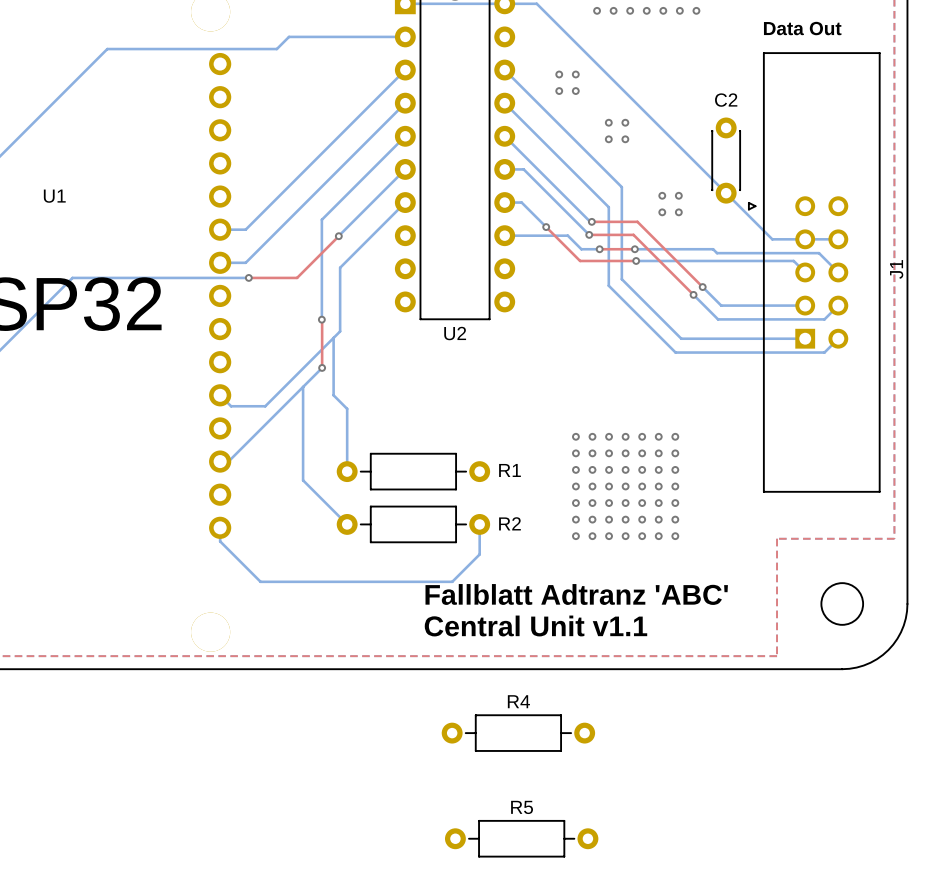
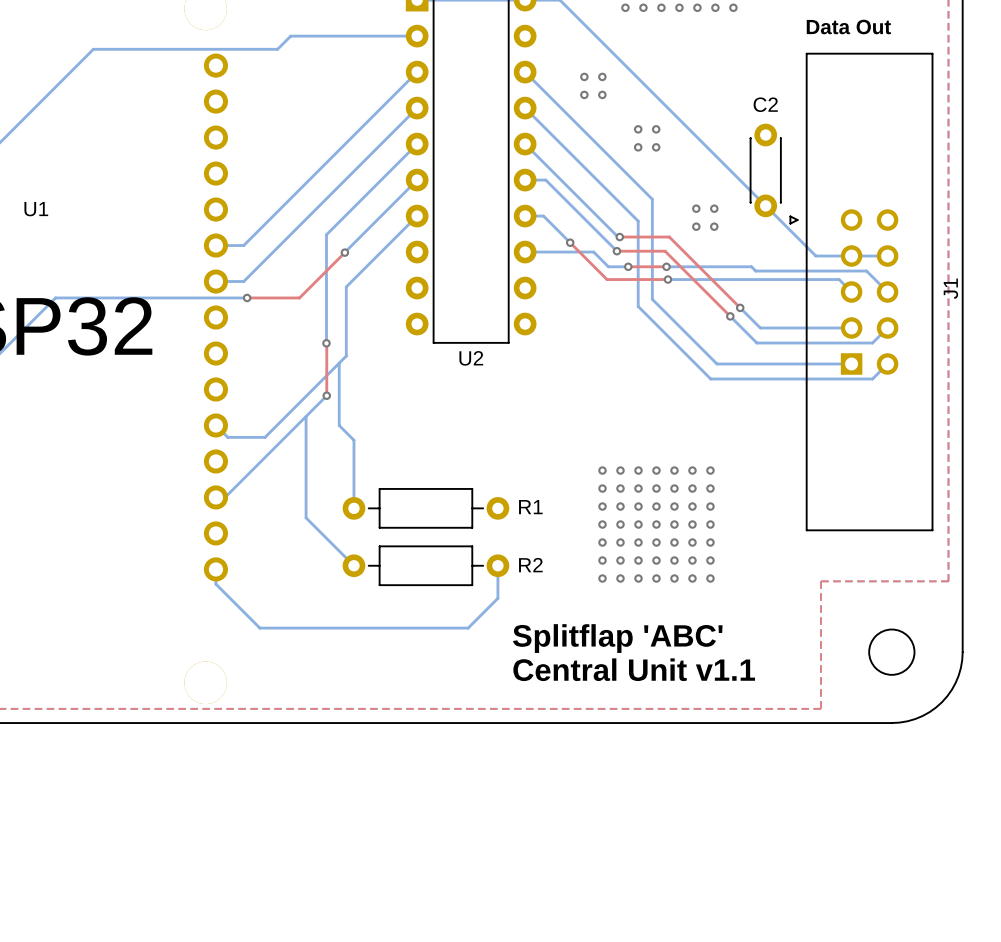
text: none -> Splitflap 'ABC' (617, 638)
text: Fallblatt Adtranz 'ABC' (576, 594) -> none
text position: Central Unit v1.1 (535, 625) -> Central Unit v1.1 (634, 669)
R4: (518, 733) -> none
R5: (521, 838) -> none

